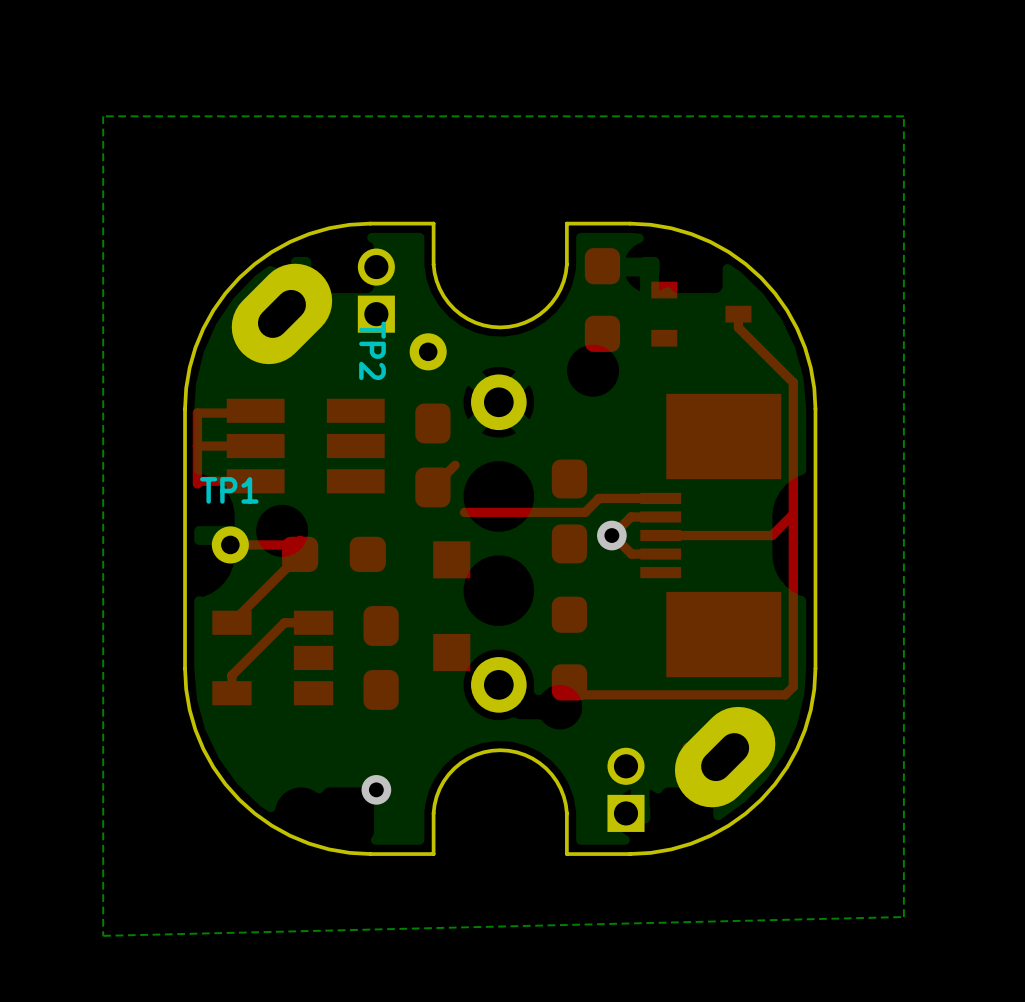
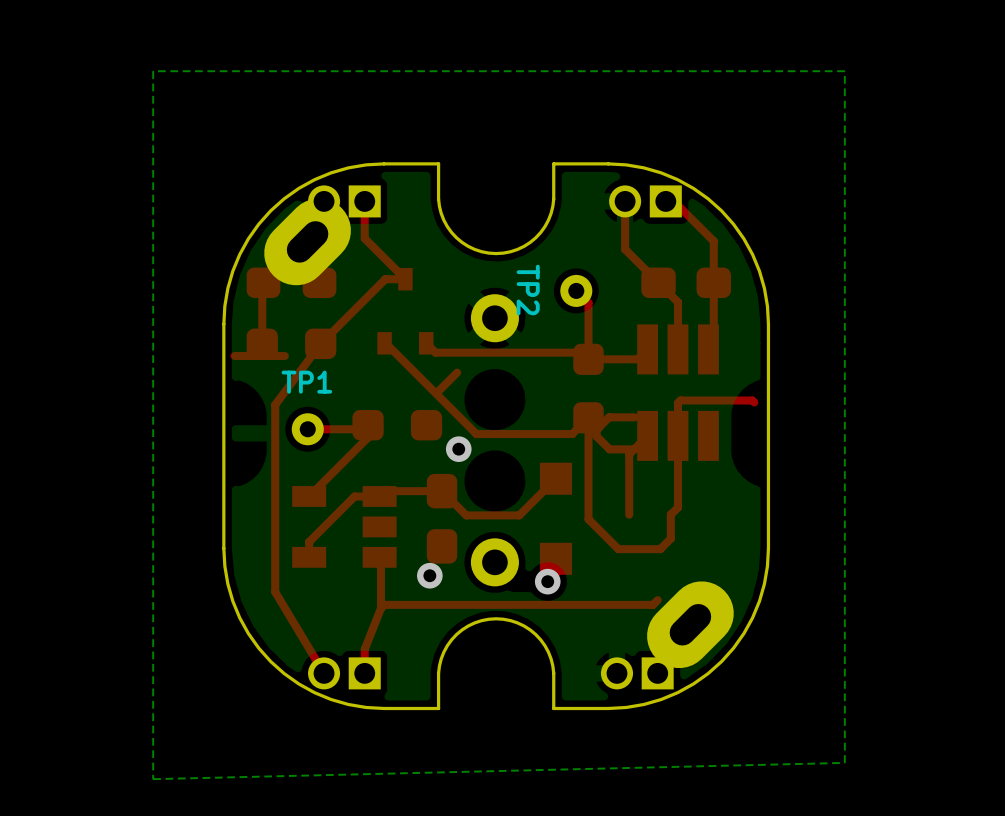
top track: none -> (364, 193) (364, 238) (405, 279) (385, 279) (320, 343) (275, 404) (275, 592) (324, 673)
top track: none -> (625, 193) (625, 249) (678, 302) (678, 349)
top track: none -> (665, 193) (713, 241) (713, 365)
part: none -> (645, 201)
part rotation: 0° (376, 290) -> 90° counterclockwise (344, 201)
part position: (376, 290) -> (344, 201)
part: (602, 300) -> none
part rotation: 0° (701, 314) -> 90° counterclockwise (405, 311)
part position: (701, 314) -> (405, 311)
top track: (738, 314) (738, 327) (793, 382) (793, 686) (785, 694) (581, 694) (569, 682) -> none
TP2 position: (428, 351) -> (576, 290)
top track: none -> (263, 282) (262, 343)
part: none -> (686, 282)
top track: none -> (576, 290) (588, 303) (588, 359)
top track: (255, 410) (253, 413) (197, 413) (197, 483) (199, 481) (255, 481) -> none
part: none -> (291, 343)
top track: none -> (384, 343) (476, 434) (572, 434) (588, 417) (588, 519) (618, 549) (660, 549) (670, 538) (670, 514) (678, 507) (678, 402) (680, 400) (752, 400) (754, 402)
top track: none -> (426, 343) (435, 352) (581, 352) (588, 359)
top track: none -> (647, 349) (637, 359) (588, 359)
part rotation: 0° (305, 446) -> 90° clockwise (678, 392)
part position: (305, 446) -> (678, 392)
part: (432, 455) -> none
part: none -> (588, 388)
top track: (660, 498) (599, 498) (585, 512) (464, 512) -> none
part rotation: 0° (569, 511) -> 90° clockwise (291, 282)
part position: (569, 511) -> (291, 282)
top track: (793, 514) (772, 535) (660, 535) -> none
top track: none -> (307, 429) (363, 429) (368, 425) (368, 437) (309, 496)
via: (611, 535) -> none
part: (710, 535) -> none
top track: none -> (647, 435) (629, 454) (629, 514)
top track: (300, 540) (300, 554) (231, 622) -> none
TP1 position: (230, 544) -> (307, 429)
top track: (295, 544) (230, 544) -> none
via: none -> (458, 449)
part position: (333, 554) -> (397, 425)
top track: none -> (555, 478) (519, 515) (466, 515) (442, 491) (384, 491) (379, 496) (354, 496) (309, 541) (309, 557)
part footprint: [551, 596, 588, 701] -> [539, 462, 572, 575]
part: (451, 606) -> none
top track: (319, 616) (313, 622) (284, 622) (231, 675) (231, 693) -> none
part position: (272, 657) -> (344, 526)
part position: (381, 657) -> (442, 518)
top track: none -> (379, 557) (381, 608)
via: none -> (429, 575)
via: none -> (547, 581)
top track: none -> (657, 600) (652, 604) (384, 604) (381, 608)
top track: none -> (381, 608) (364, 649) (364, 673)
via: (376, 789) -> none
part rotation: 0° (626, 789) -> 90° counterclockwise (637, 673)
part: none -> (344, 673)

